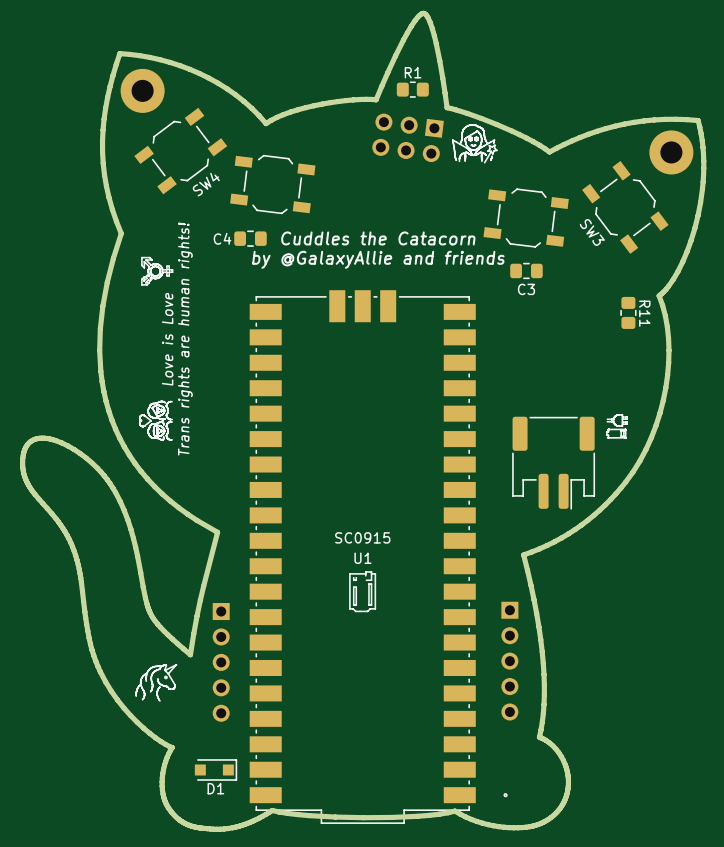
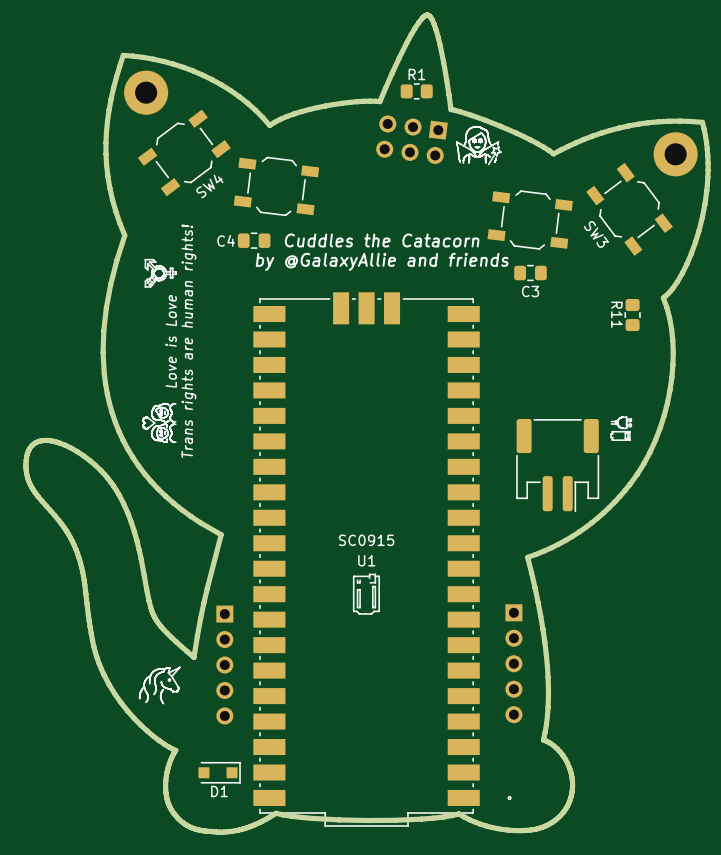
R11 name position: R11 (644, 313) -> R11 (616, 314)

